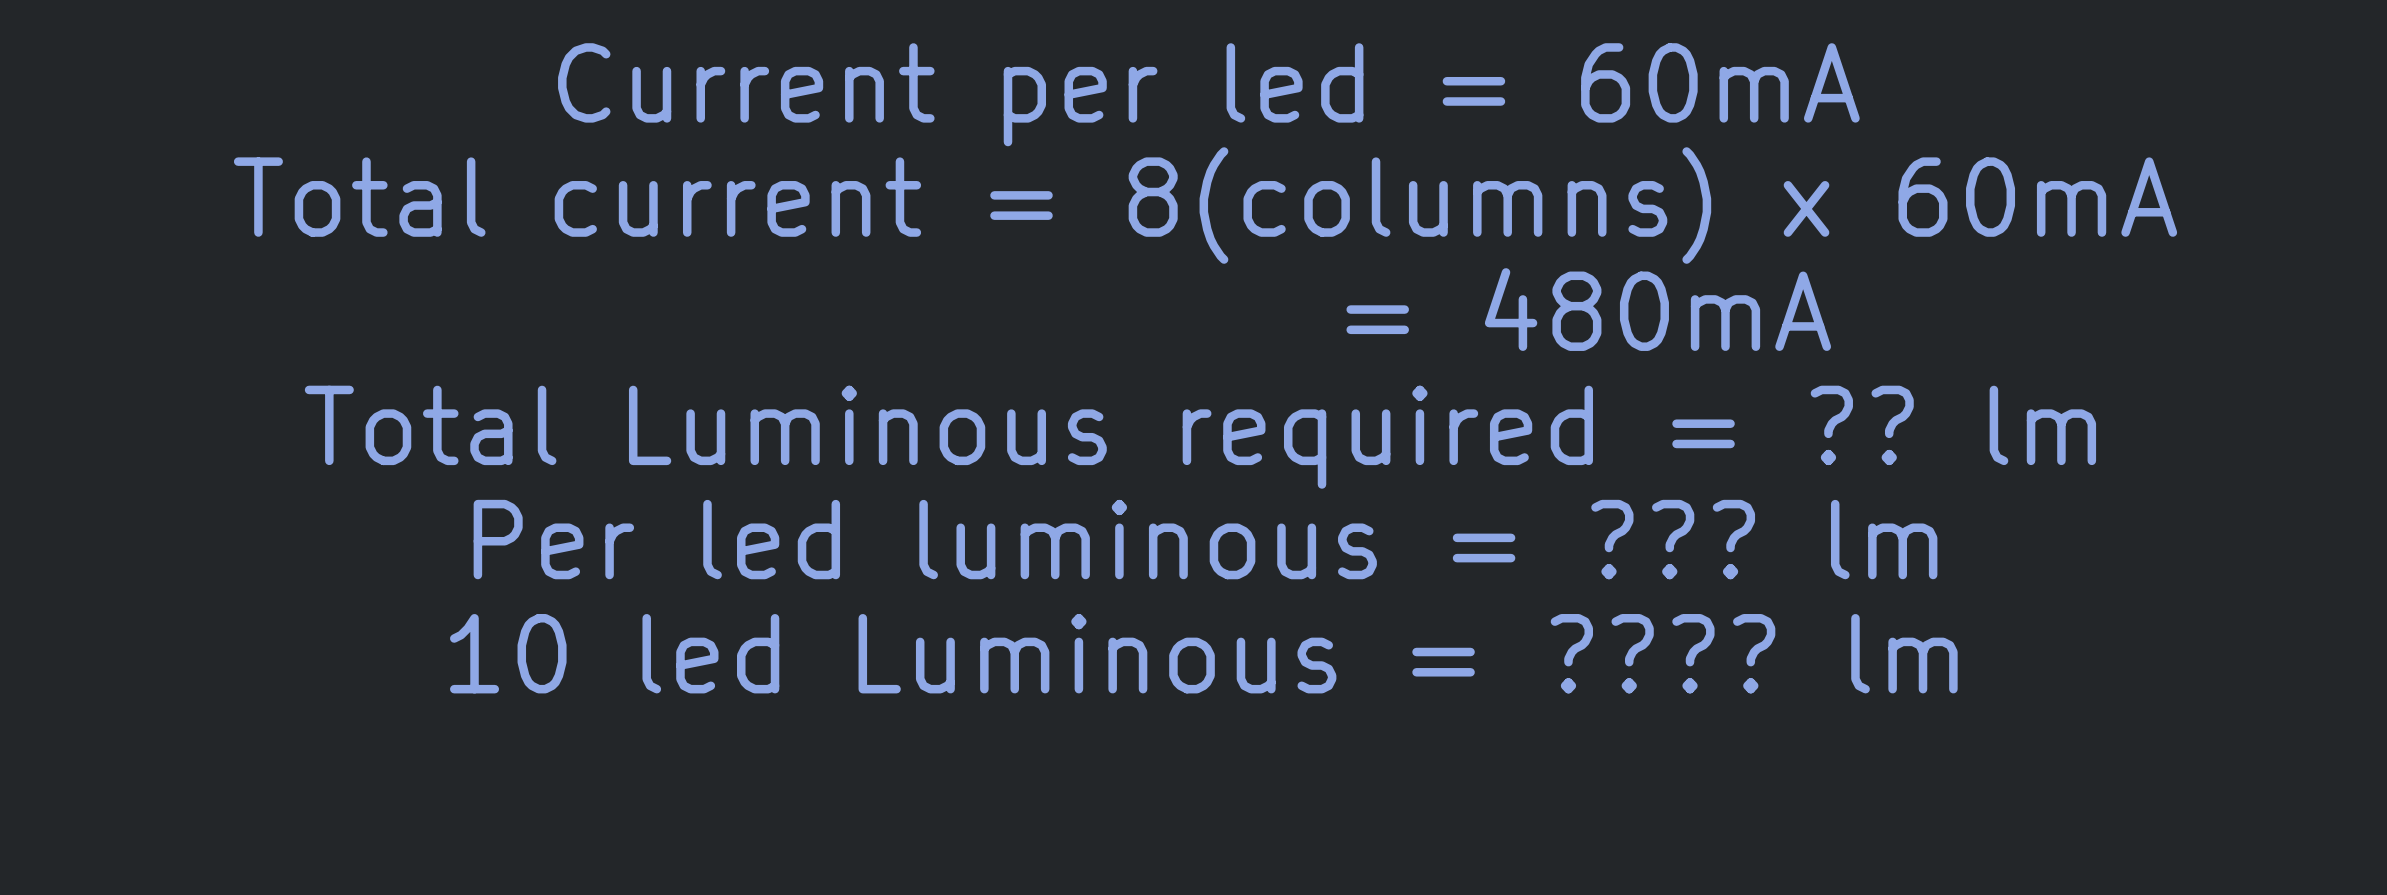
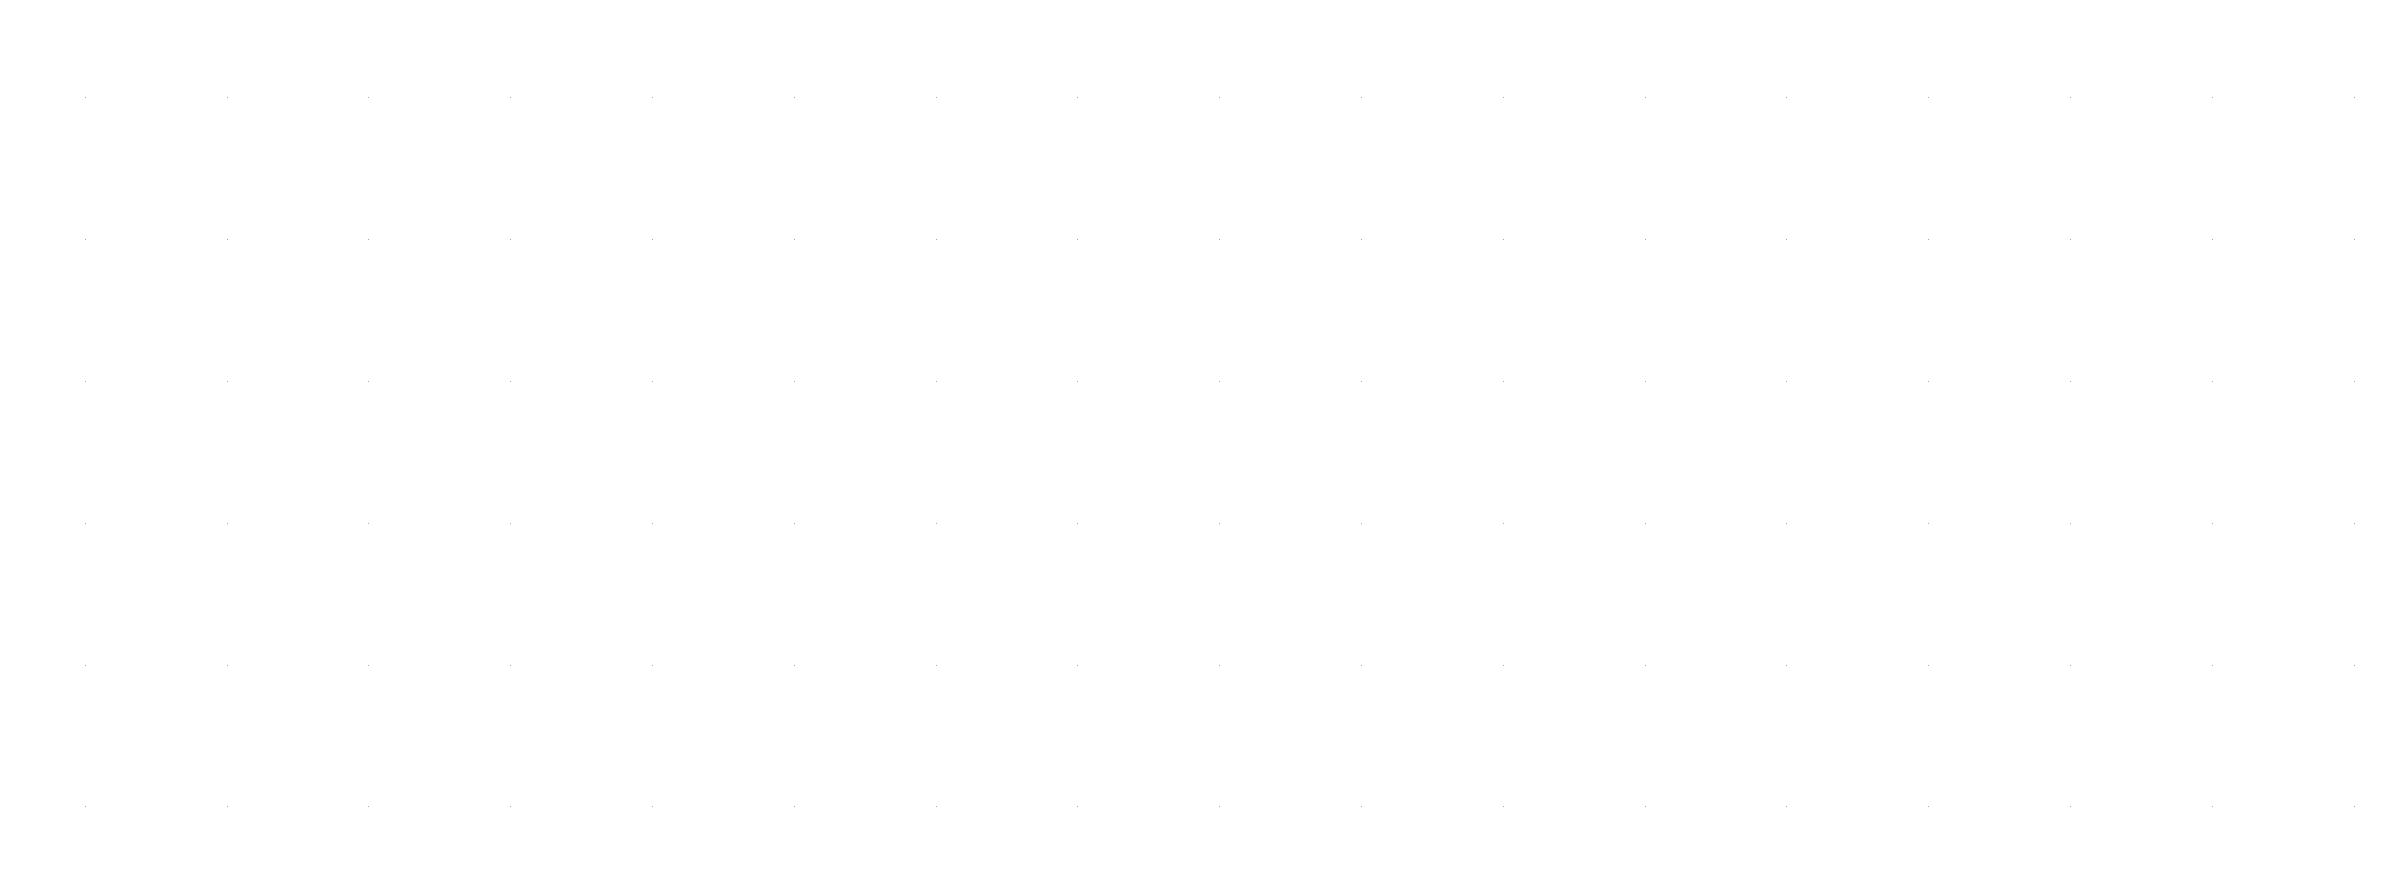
text: Current per led = 60mA (1208, 94) -> none
text: Total current = 8(columns) x 60mA (1205, 205) -> none
text: = 480mA (1588, 309) -> none
text: Total Luminous required = ?? lm (1200, 437) -> none
text: Per led luminous = ??? lm (1205, 539) -> none
text: 10 led Luminous = ???? lm (1203, 653) -> none

